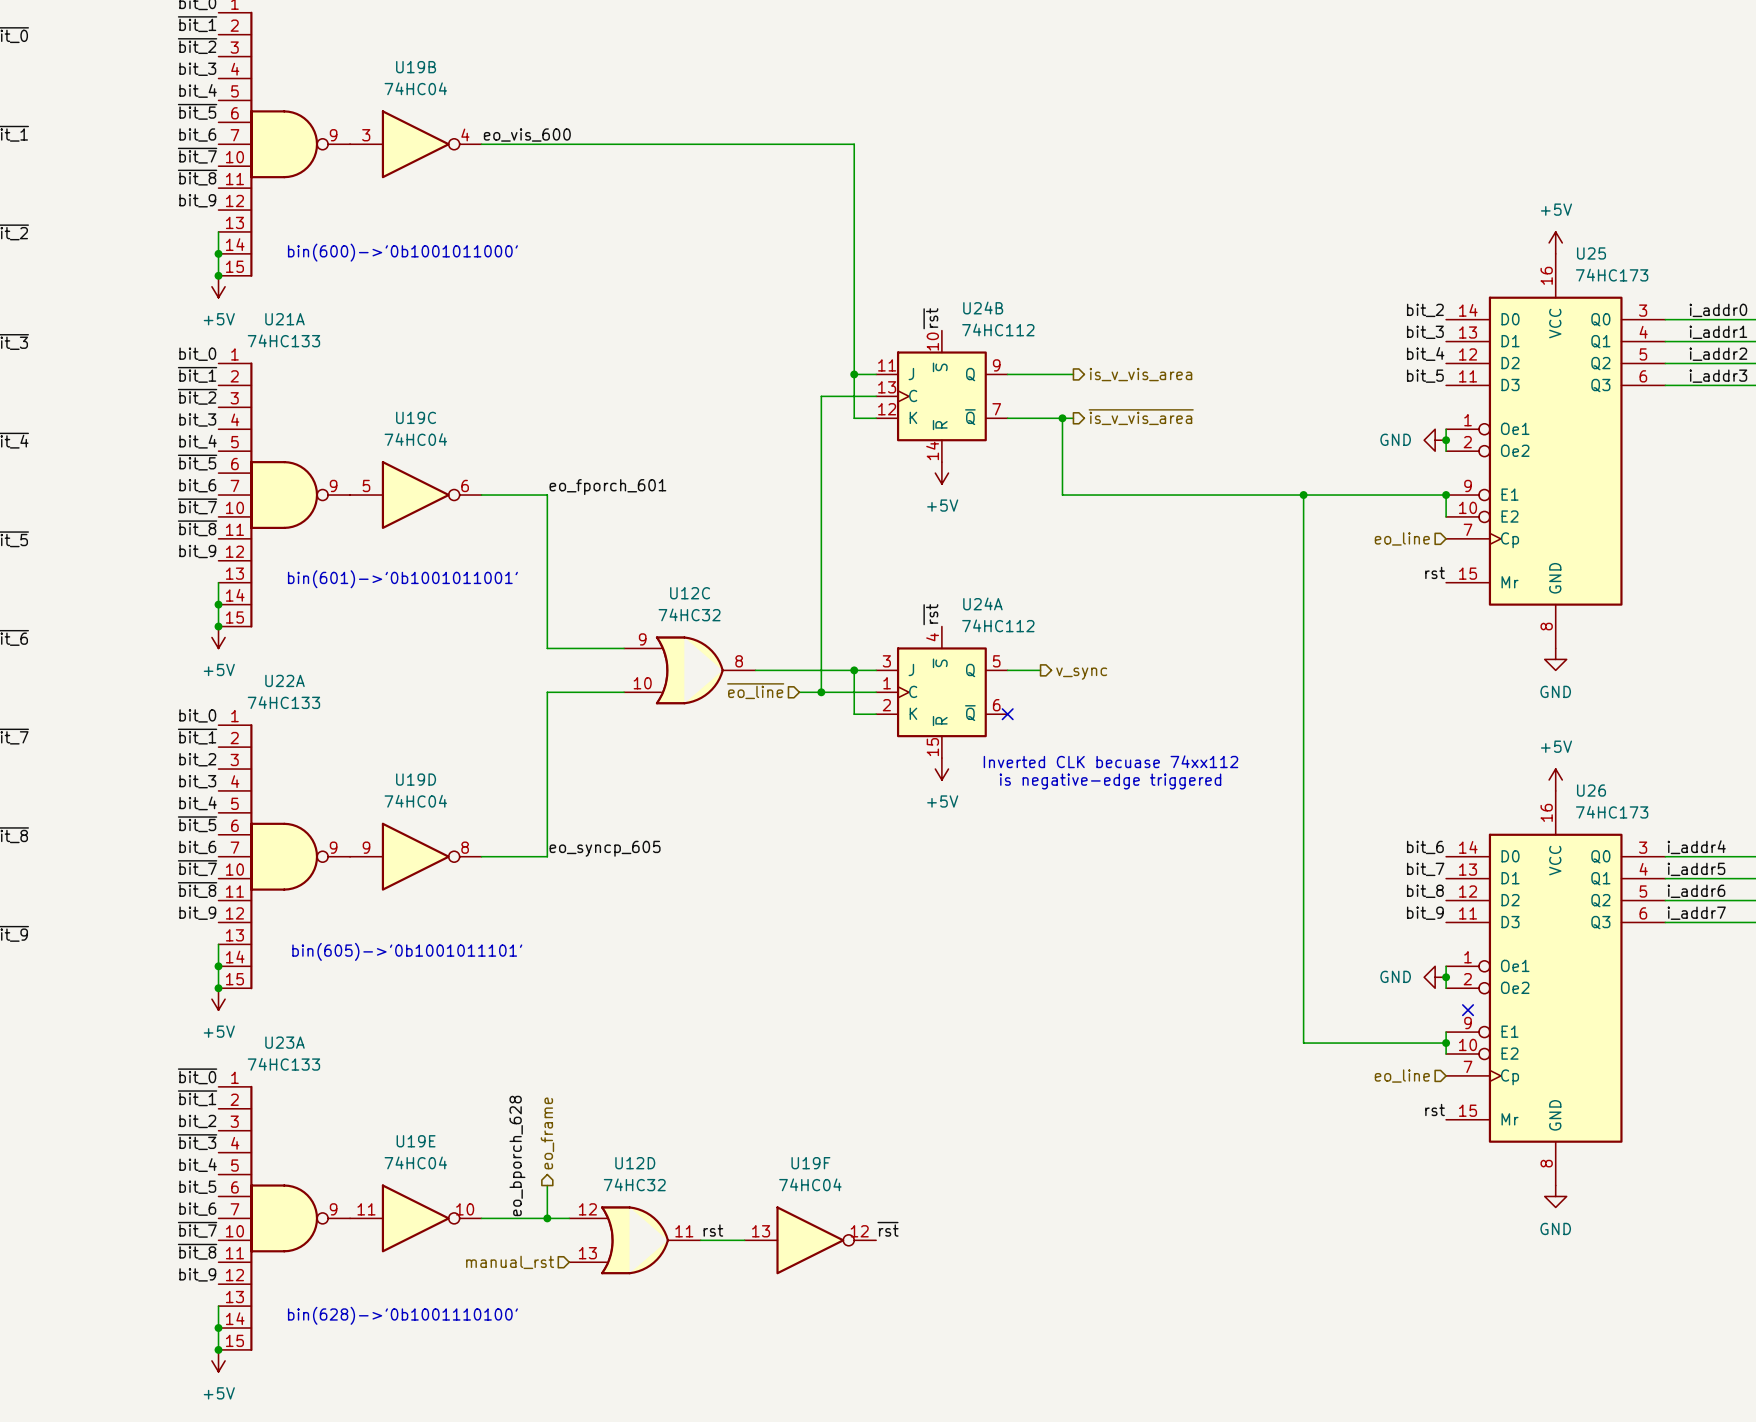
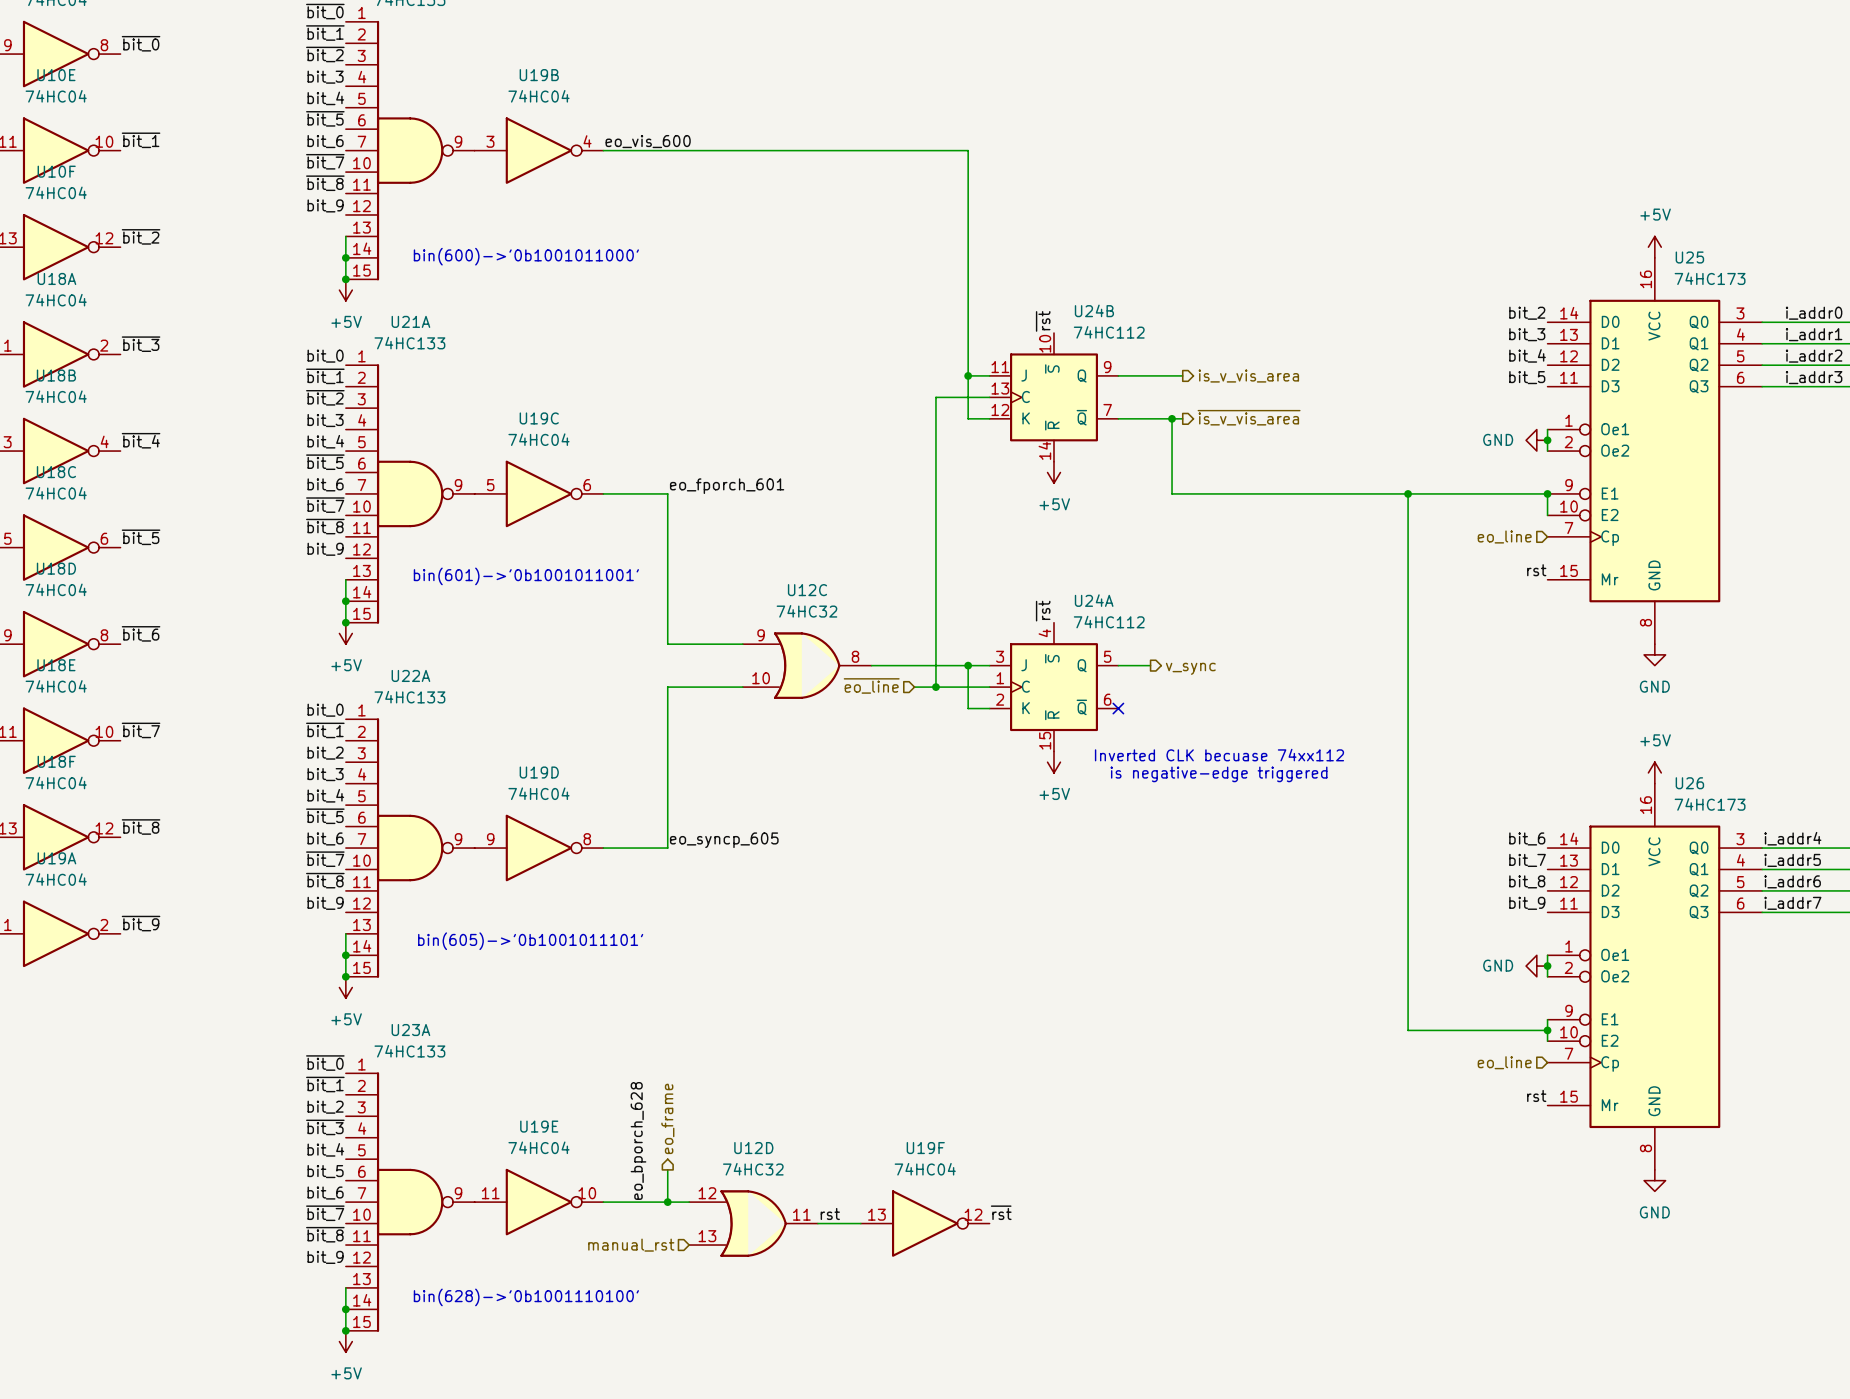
no-connect mark: (1468, 1010) -> none

